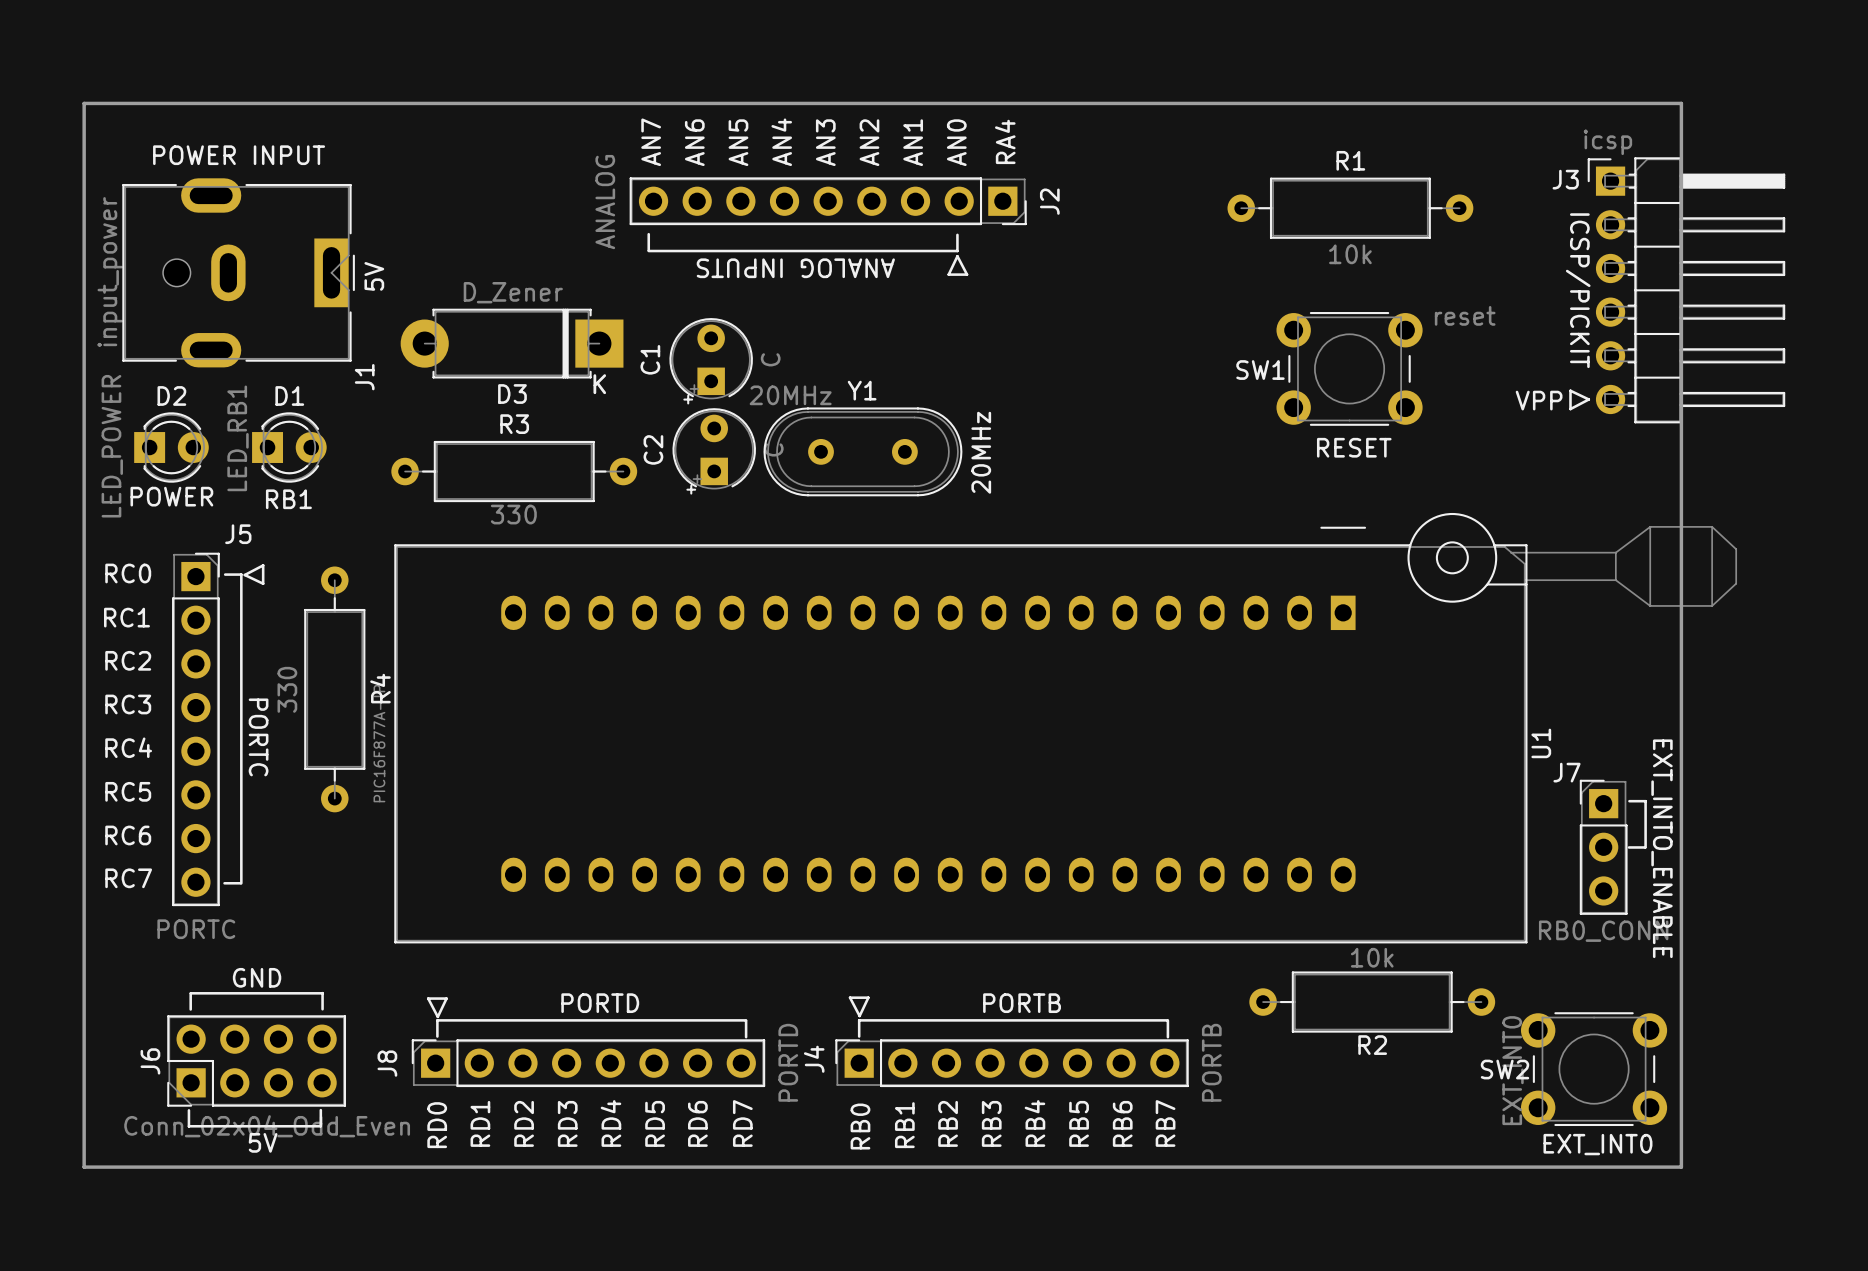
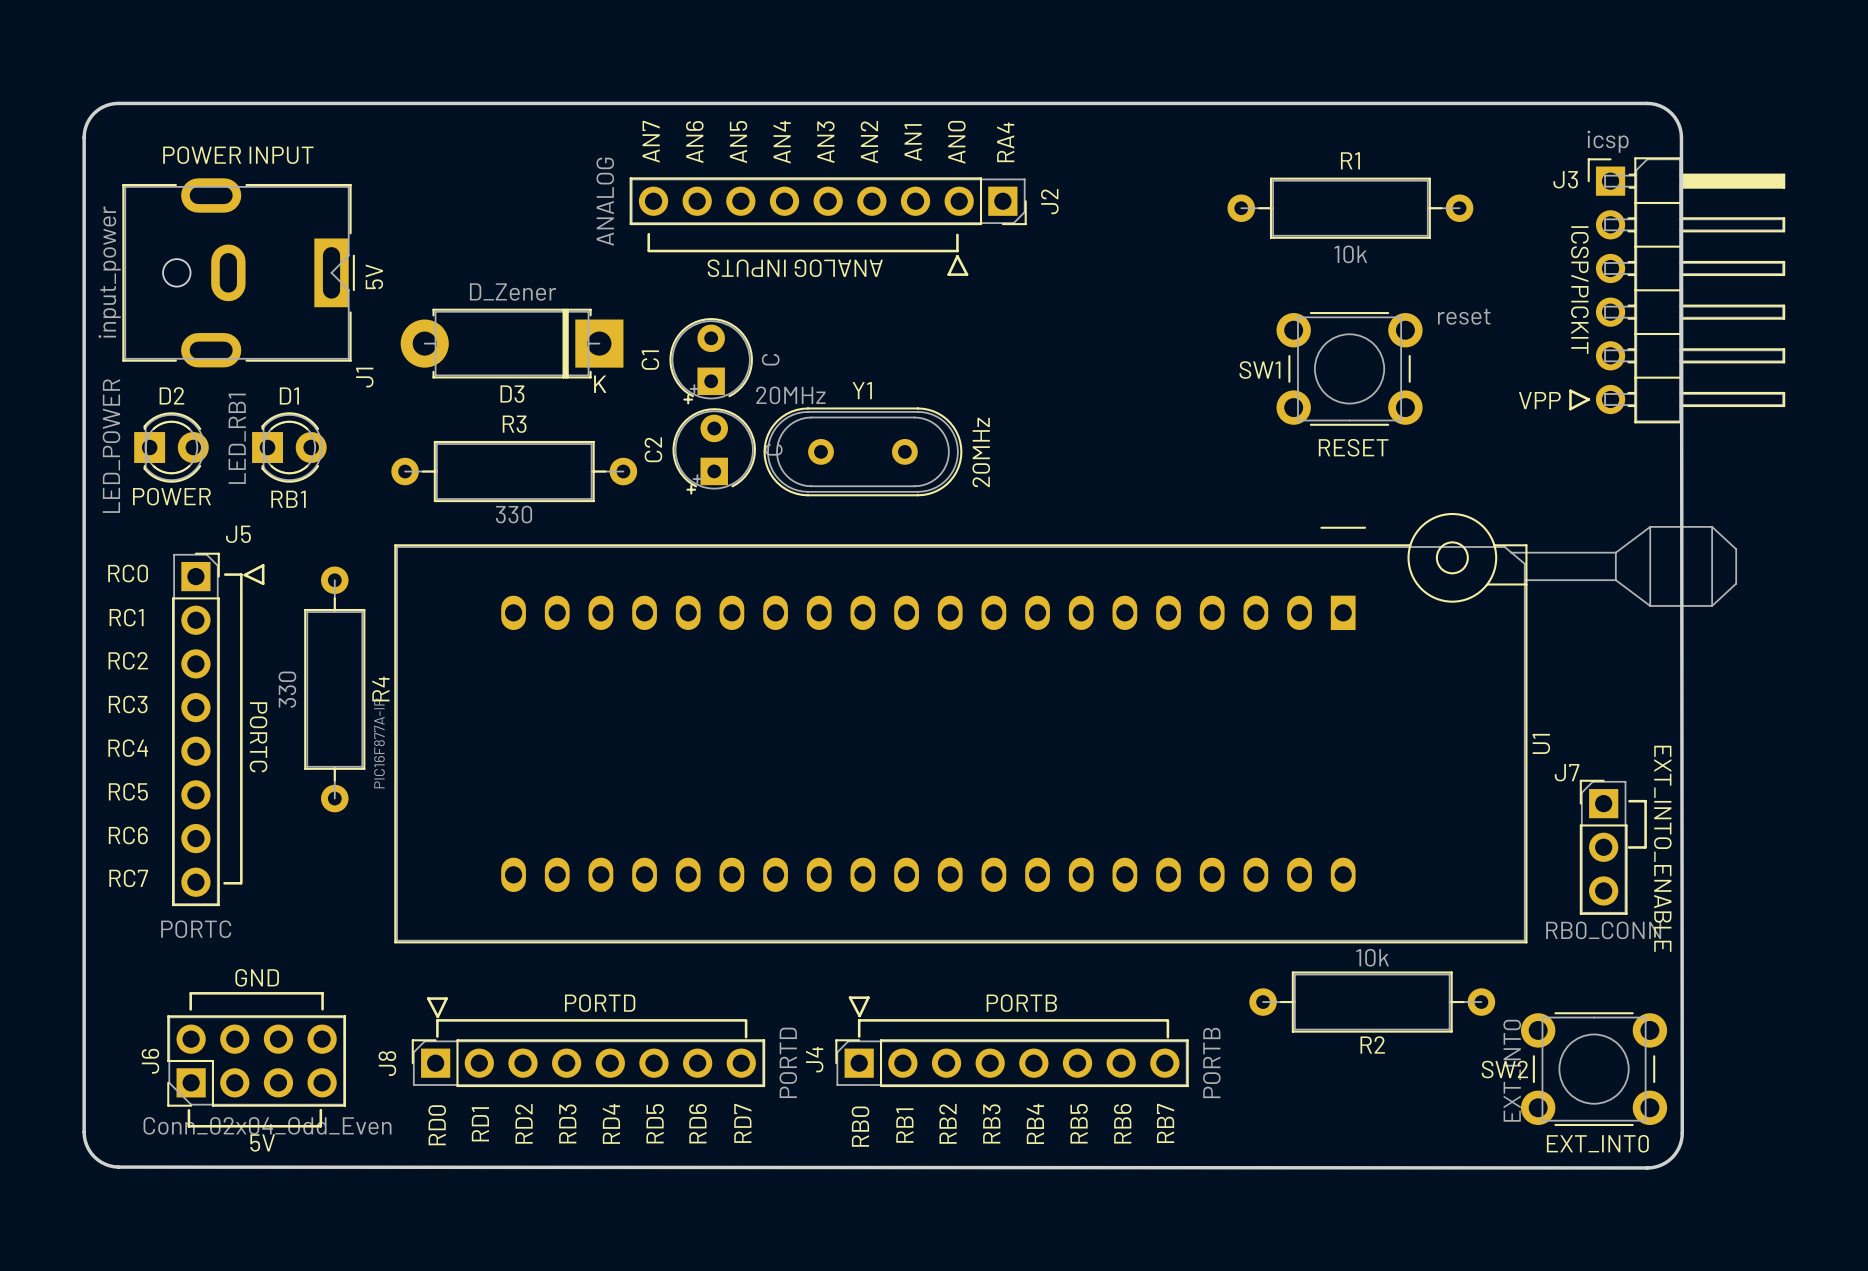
board edge: (118, 103) (84, 103) (84, 137) -> (118, 103) (106, 105) (94, 113) (87, 122) (84, 137)
board edge: (1647, 103) (1681, 103) (1681, 1167) (84, 1167) (84, 1132) -> (1647, 103) (1660, 106) (1671, 113) (1678, 124) (1681, 137) (1682, 1133) (1676, 1151) (1665, 1162) (1647, 1167) (118, 1167) (105, 1164) (94, 1156) (86, 1145) (84, 1132)

